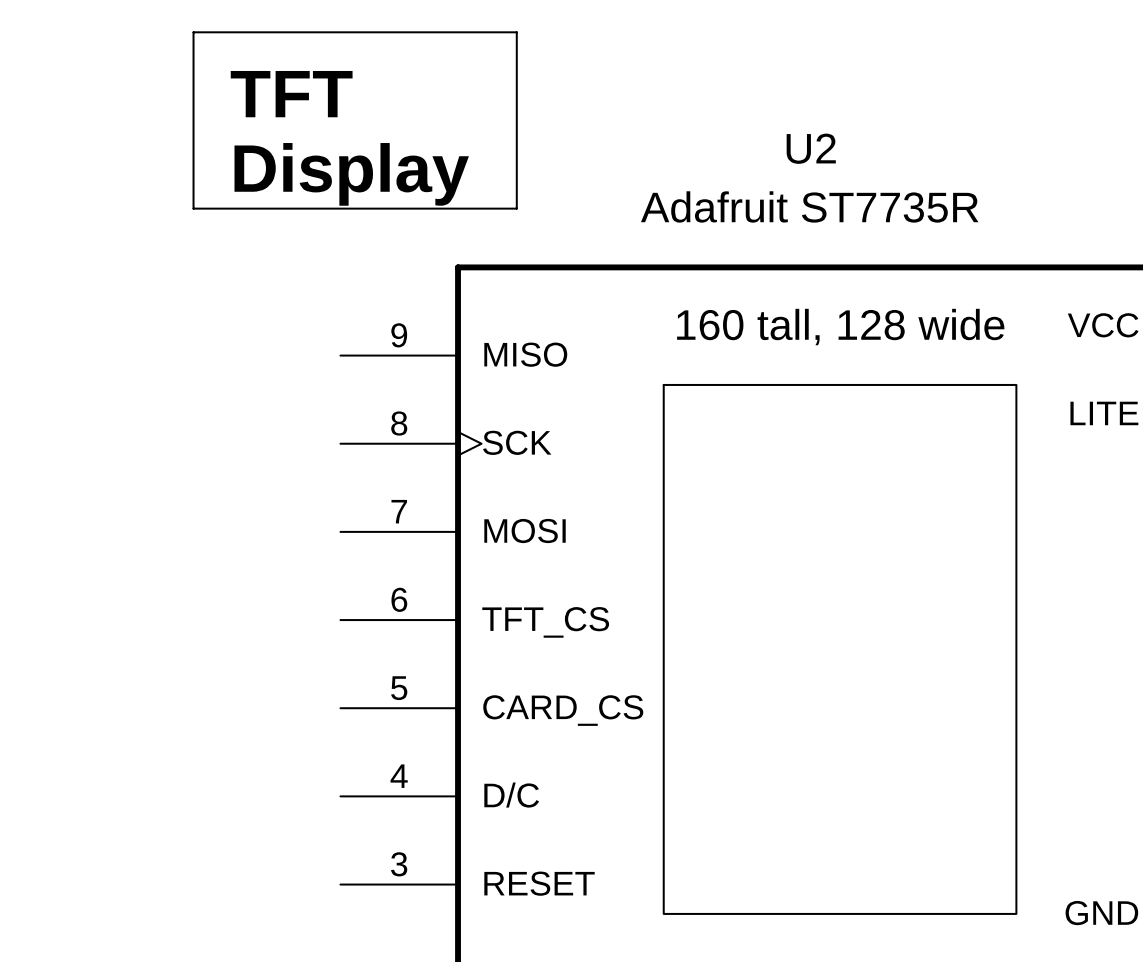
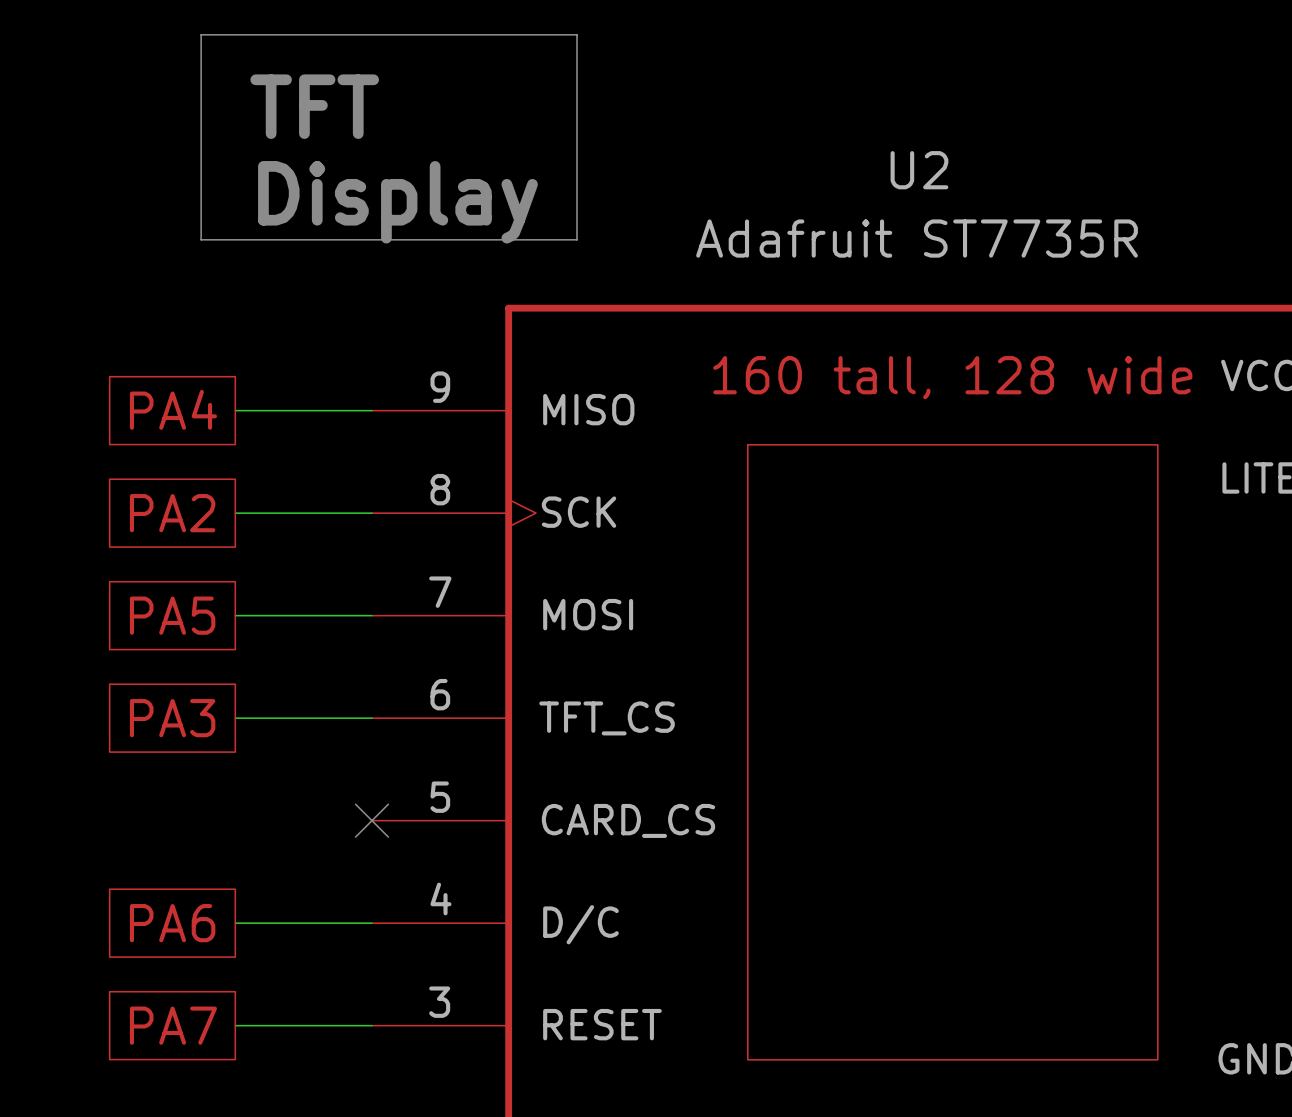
global label: none -> PA4 (173, 409)
wire: none -> (235, 410) (371, 410)
global label: none -> PA2 (172, 513)
wire: none -> (235, 513) (371, 513)
wire: none -> (235, 615) (371, 615)
global label: none -> PA5 (172, 615)
global label: none -> PA3 (172, 718)
wire: none -> (235, 718) (371, 718)
no-connect mark: none -> (371, 820)
global label: none -> PA6 (172, 923)
wire: none -> (235, 923) (371, 923)
global label: none -> PA7 (173, 1025)
wire: none -> (235, 1025) (371, 1025)

